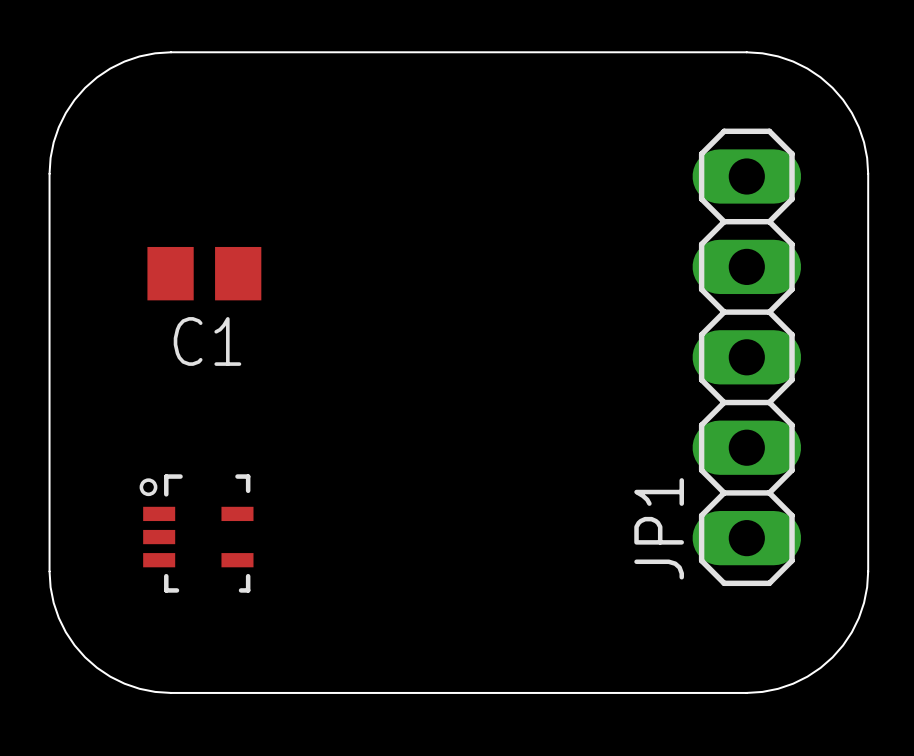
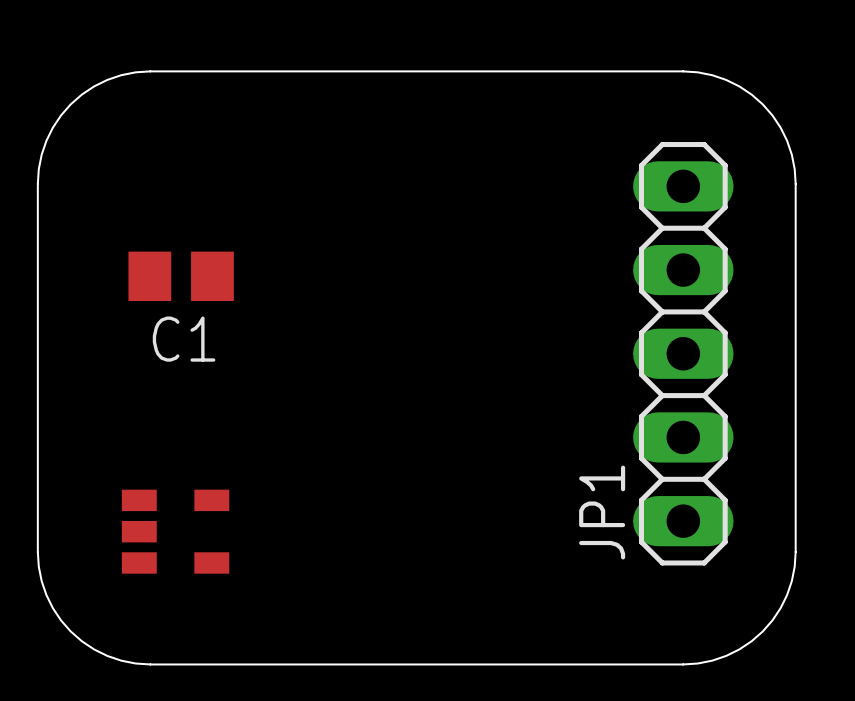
part footprint: [139, 474, 254, 593] -> [121, 489, 230, 574]

